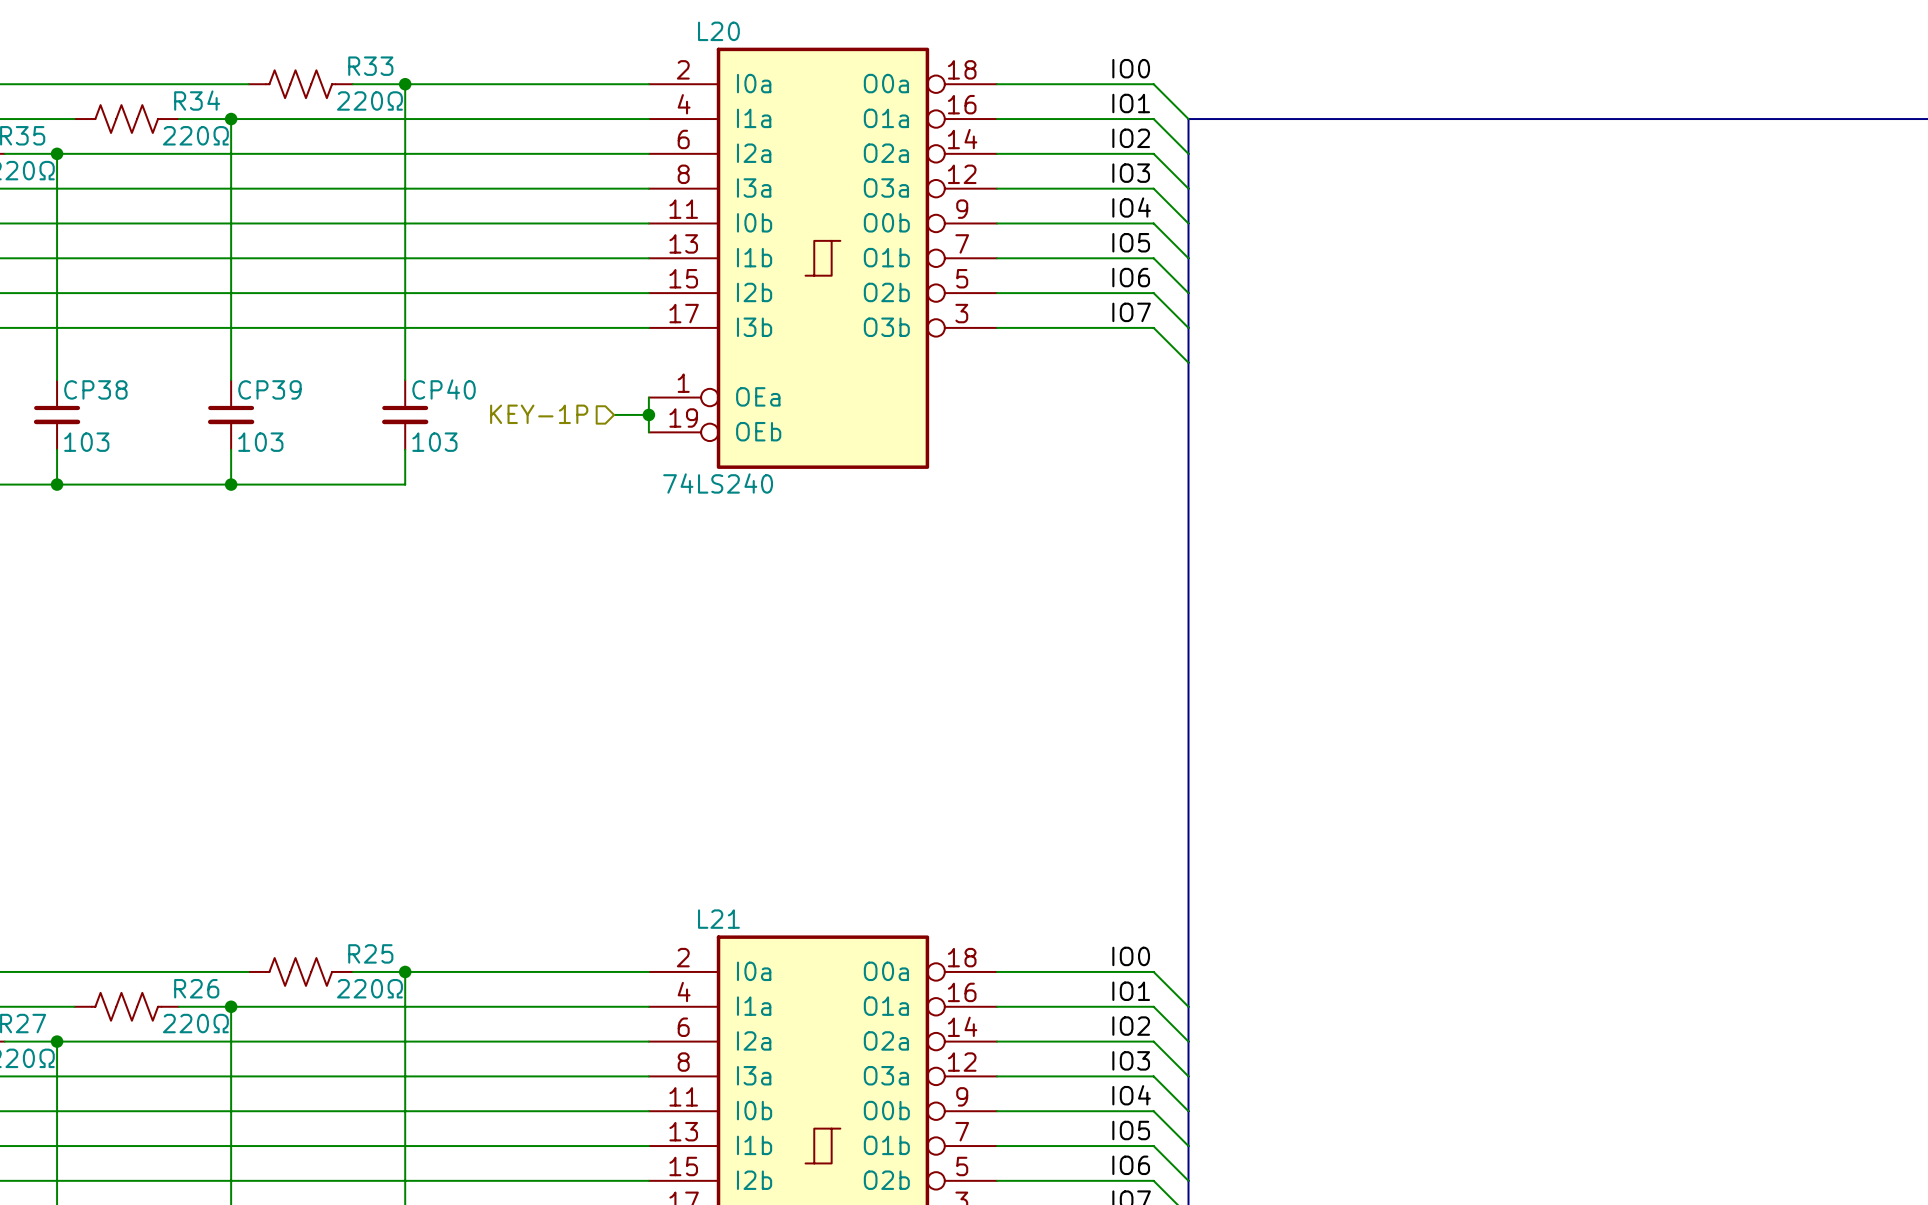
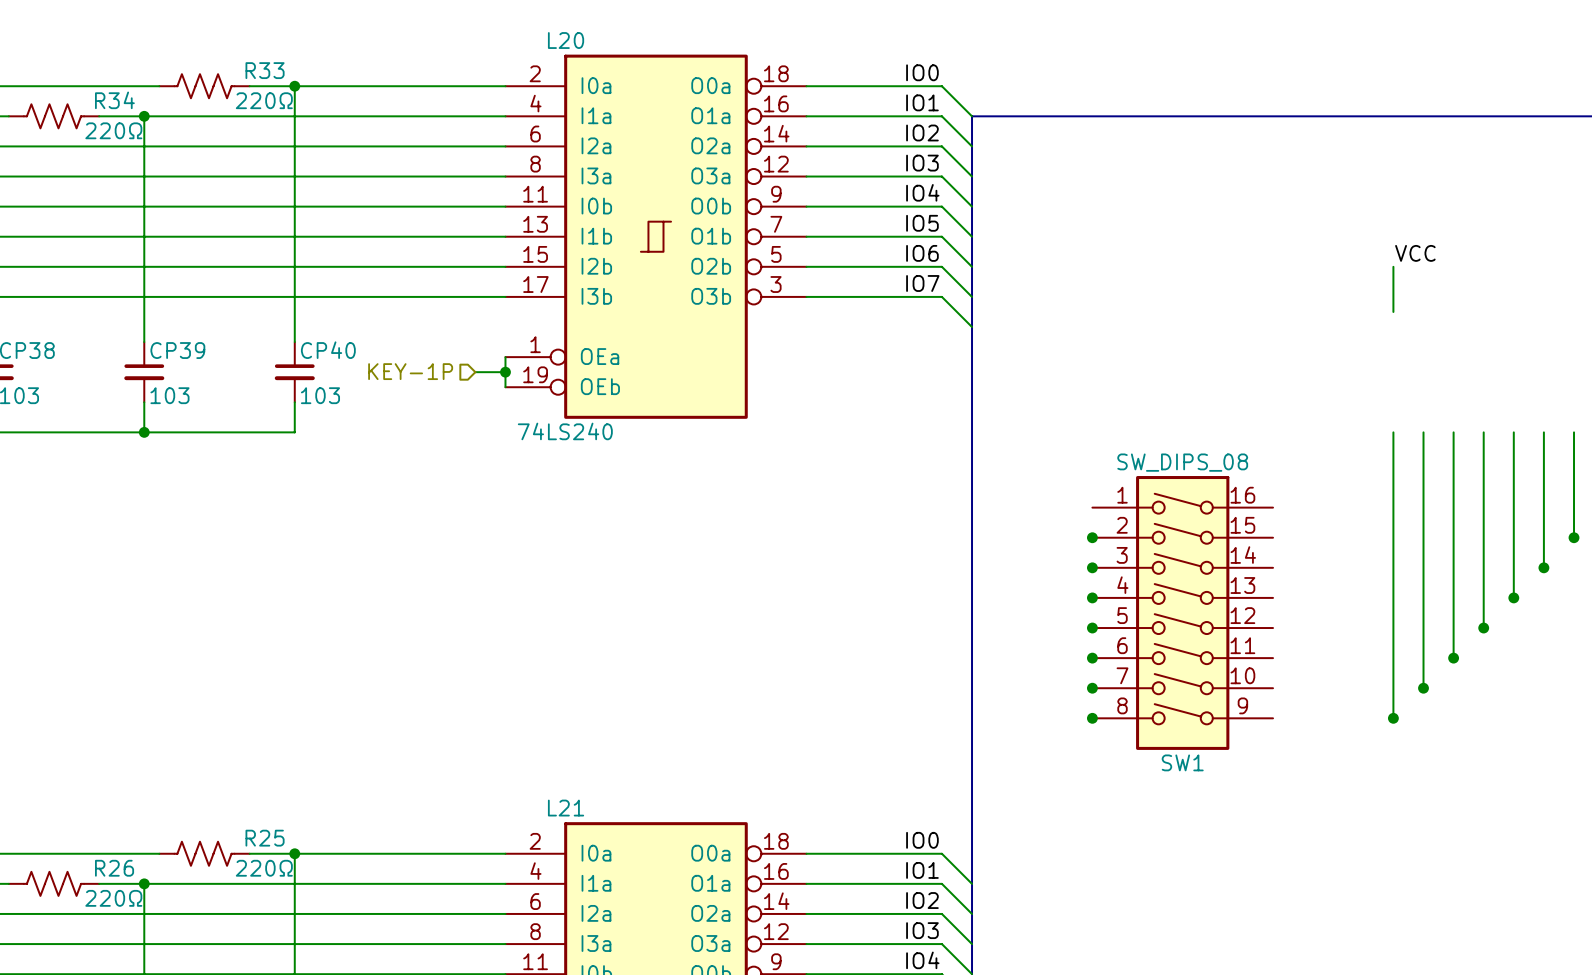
label: none -> VCC (1415, 253)
wire: none -> (1393, 266) (1393, 311)
wire: none -> (1393, 432) (1393, 718)
wire: none -> (1423, 432) (1423, 688)
wire: none -> (1453, 432) (1453, 658)
wire: none -> (1483, 432) (1483, 628)
wire: none -> (1513, 432) (1513, 597)
wire: none -> (1543, 432) (1543, 567)
wire: none -> (1574, 432) (1574, 537)
junction: none -> (1092, 537)
junction: none -> (1574, 537)
junction: none -> (1092, 567)
junction: none -> (1543, 567)
junction: none -> (1092, 597)
junction: none -> (1513, 597)
SW1: none -> SW_DIPS_08 (1182, 612)
junction: none -> (1092, 628)
junction: none -> (1483, 628)
junction: none -> (1092, 658)
junction: none -> (1453, 658)
junction: none -> (1092, 688)
junction: none -> (1423, 688)
junction: none -> (1092, 718)
junction: none -> (1393, 718)

